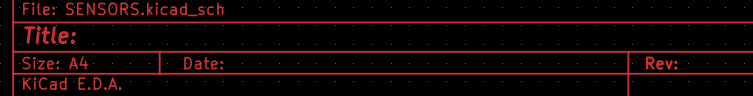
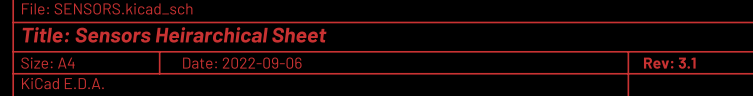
title block: Title: (50, 35) -> Title: Sensors Heirarchical Sheet (174, 34)
title block: Date: (203, 63) -> Date: 2022-09-06 (242, 63)
title block: Rev: (661, 63) -> Rev: 3.1 (669, 63)

